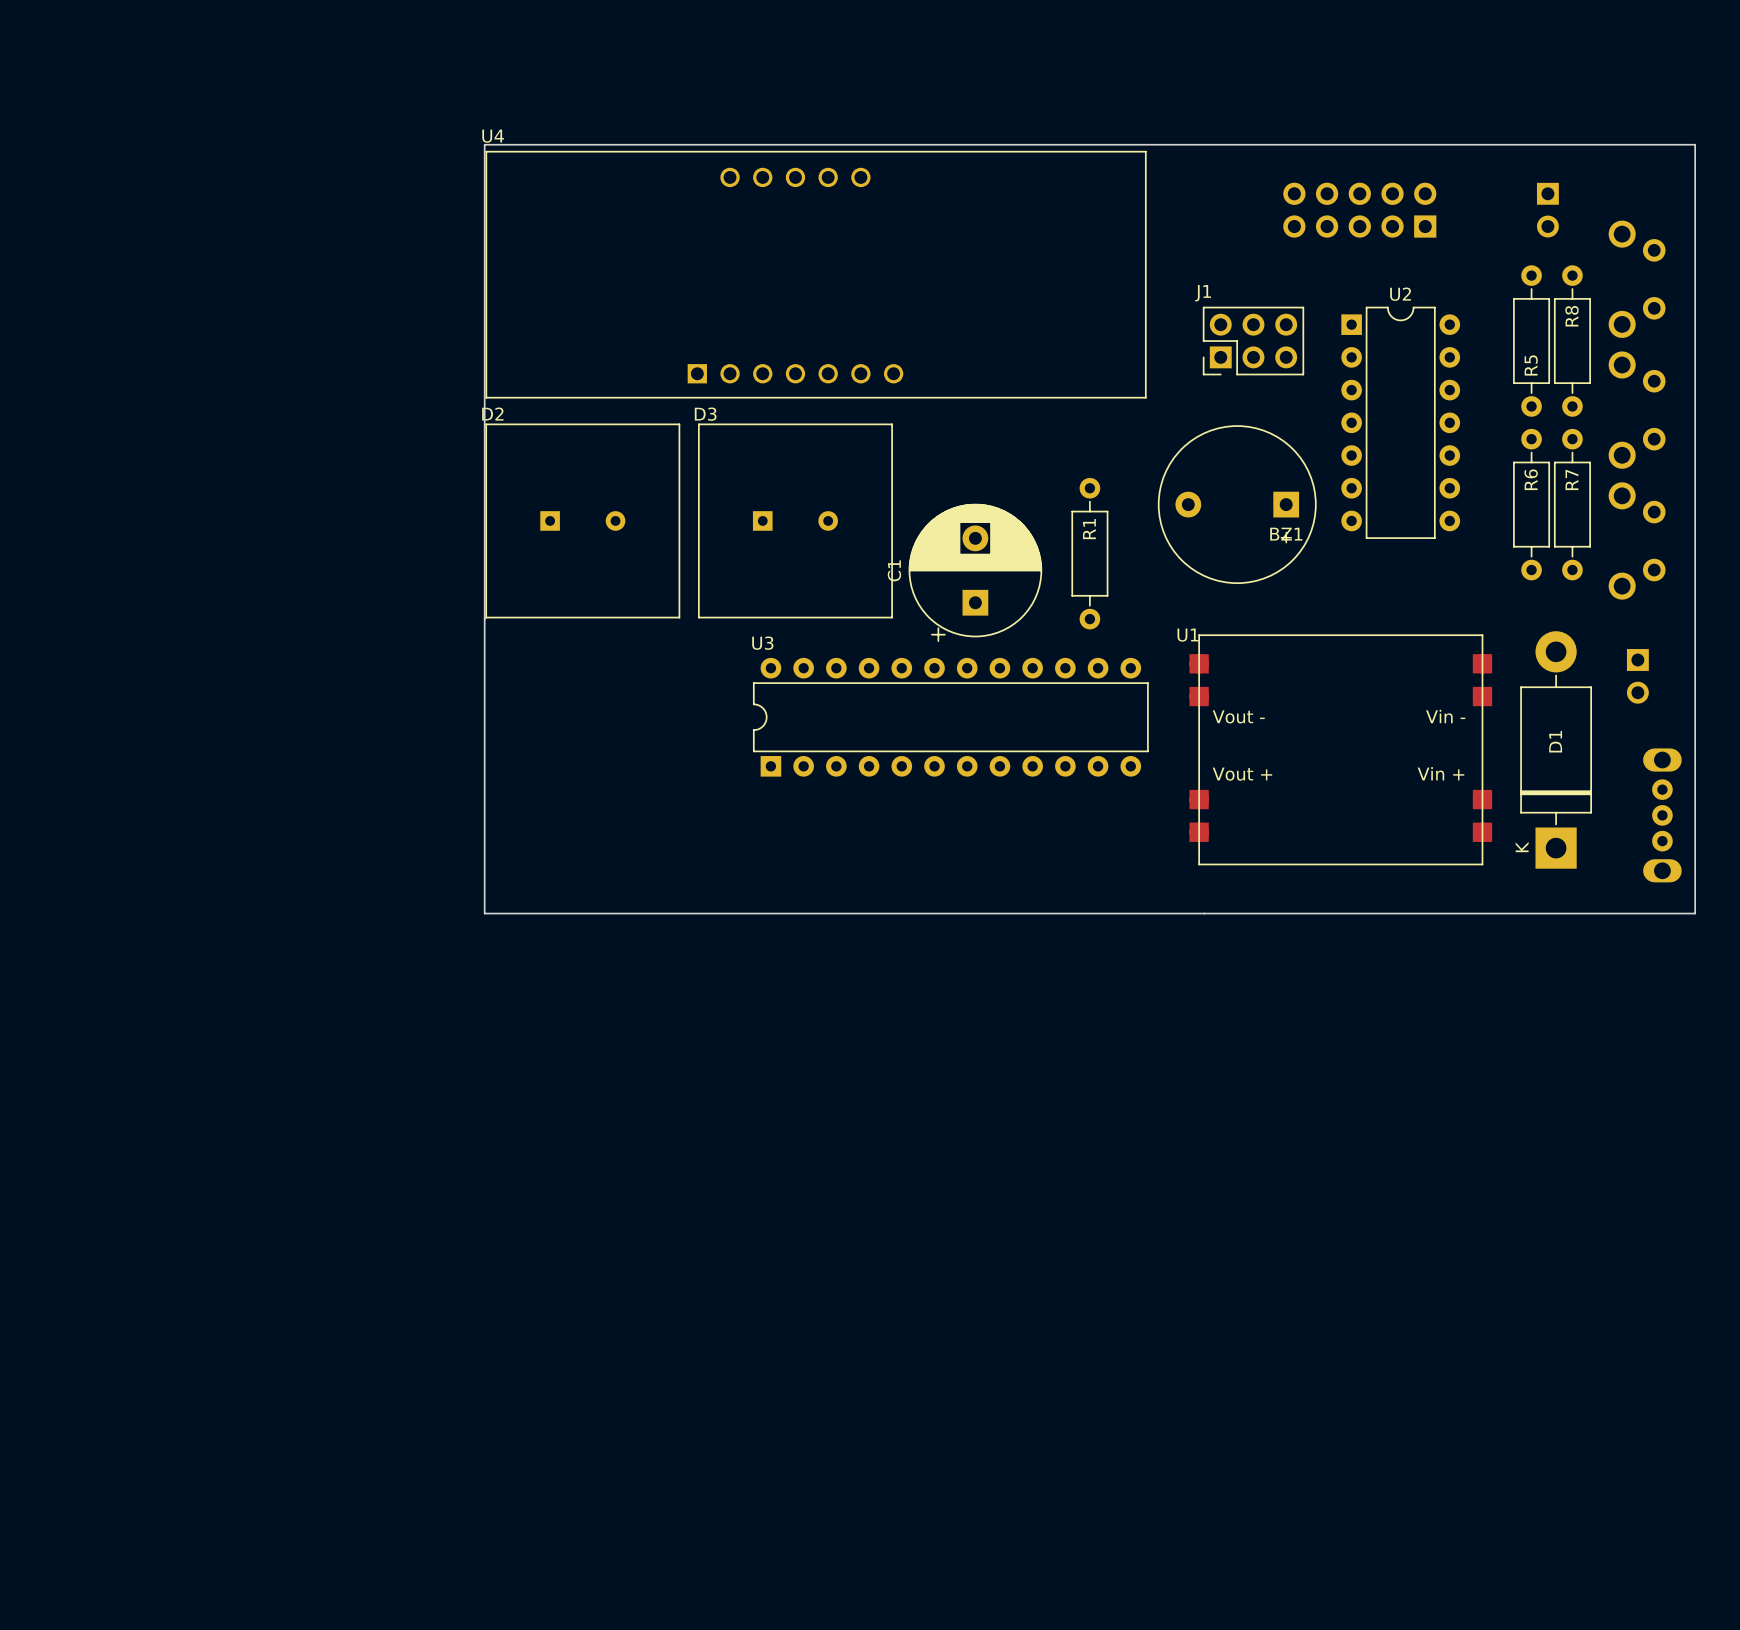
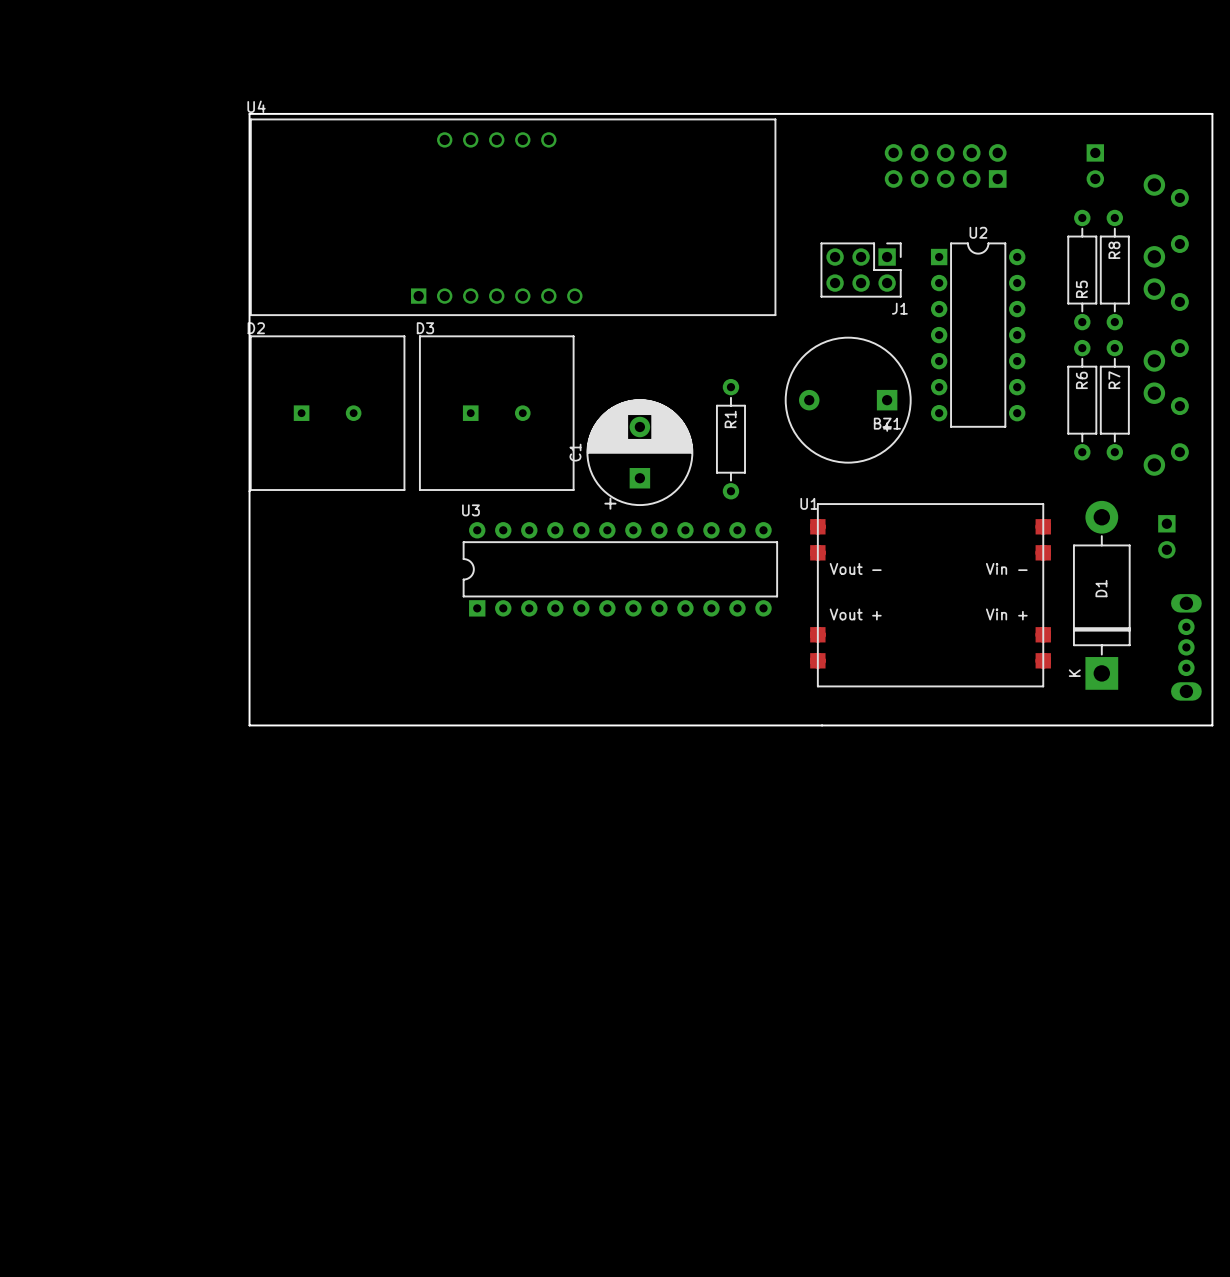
J1 rotation: 0° (1253, 341) -> 180° (861, 270)

